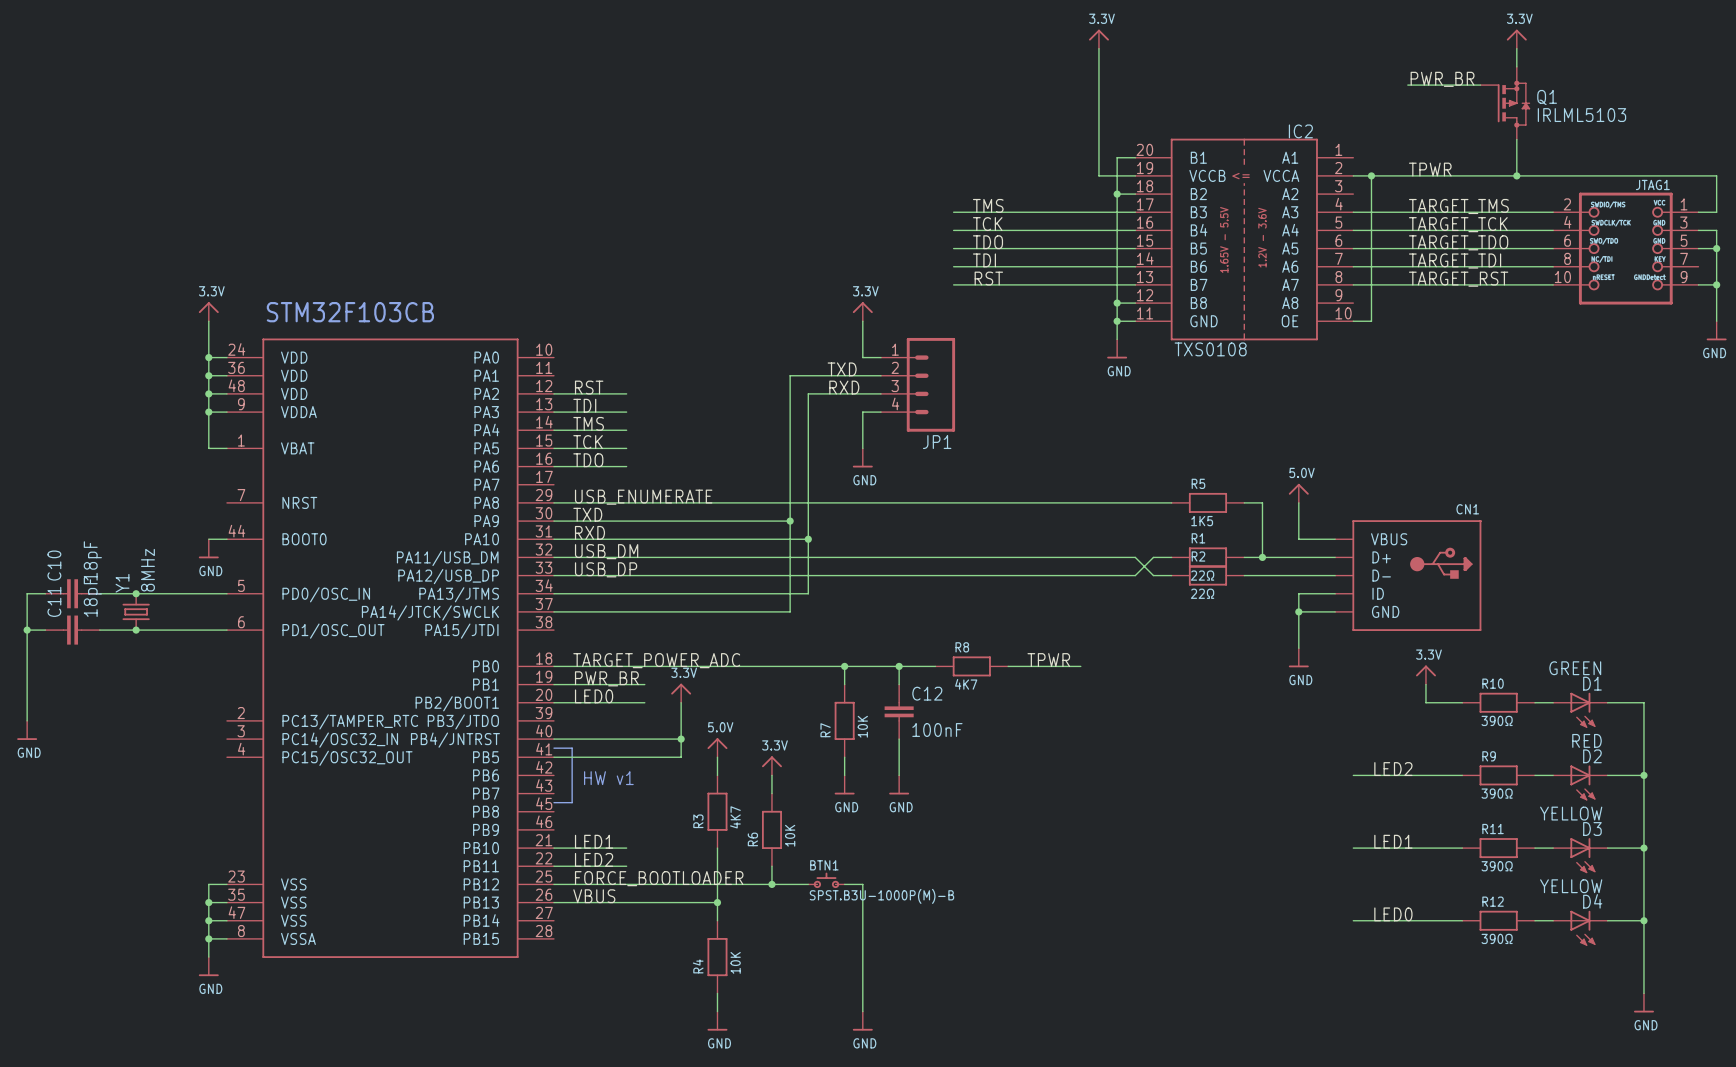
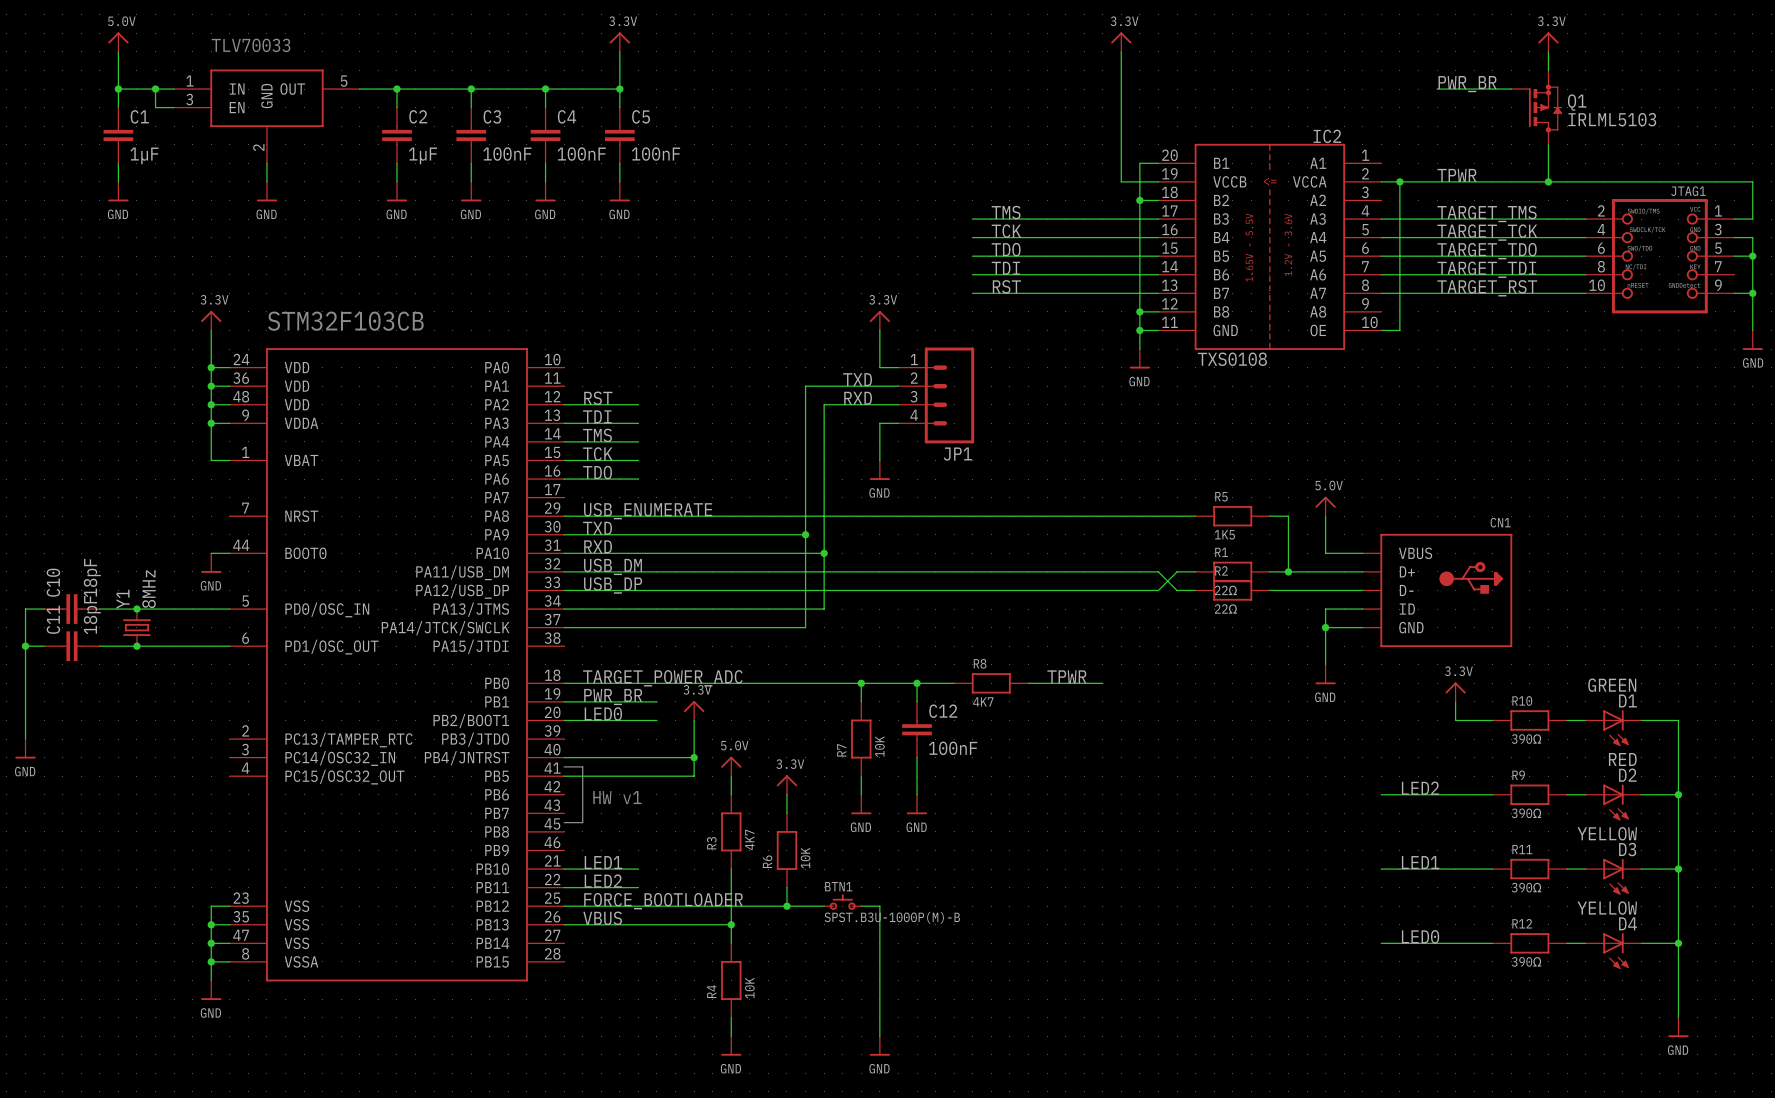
power symbol: none -> 5.0V (118, 42)
power symbol: none -> 3.3V (619, 42)
text: none -> TLV70033 (251, 45)
wire: none -> (118, 51) (118, 107)
wire: none -> (619, 51) (619, 107)
wire: none -> (118, 89) (174, 89)
junction: none -> (118, 89)
wire: none -> (155, 89) (155, 107) (174, 107)
junction: none -> (155, 89)
wire: none -> (359, 89) (619, 89)
wire: none -> (396, 89) (396, 107)
junction: none -> (396, 89)
wire: none -> (471, 89) (471, 107)
junction: none -> (471, 89)
wire: none -> (545, 89) (545, 107)
junction: none -> (545, 89)
junction: none -> (619, 89)
part: none -> (266, 116)
C1: none -> 1µF (118, 135)
C2: none -> 1µF (396, 135)
C3: none -> 100nF (471, 135)
C4: none -> 100nF (545, 135)
C5: none -> 100nF (619, 135)
wire: none -> (118, 163) (118, 181)
wire: none -> (266, 163) (266, 181)
wire: none -> (396, 163) (396, 181)
wire: none -> (471, 163) (471, 181)
wire: none -> (545, 163) (545, 181)
wire: none -> (619, 163) (619, 181)
power symbol: none -> GND (118, 191)
power symbol: none -> GND (266, 191)
power symbol: none -> GND (396, 191)
power symbol: none -> GND (471, 191)
power symbol: none -> GND (545, 191)
power symbol: none -> GND (619, 191)

